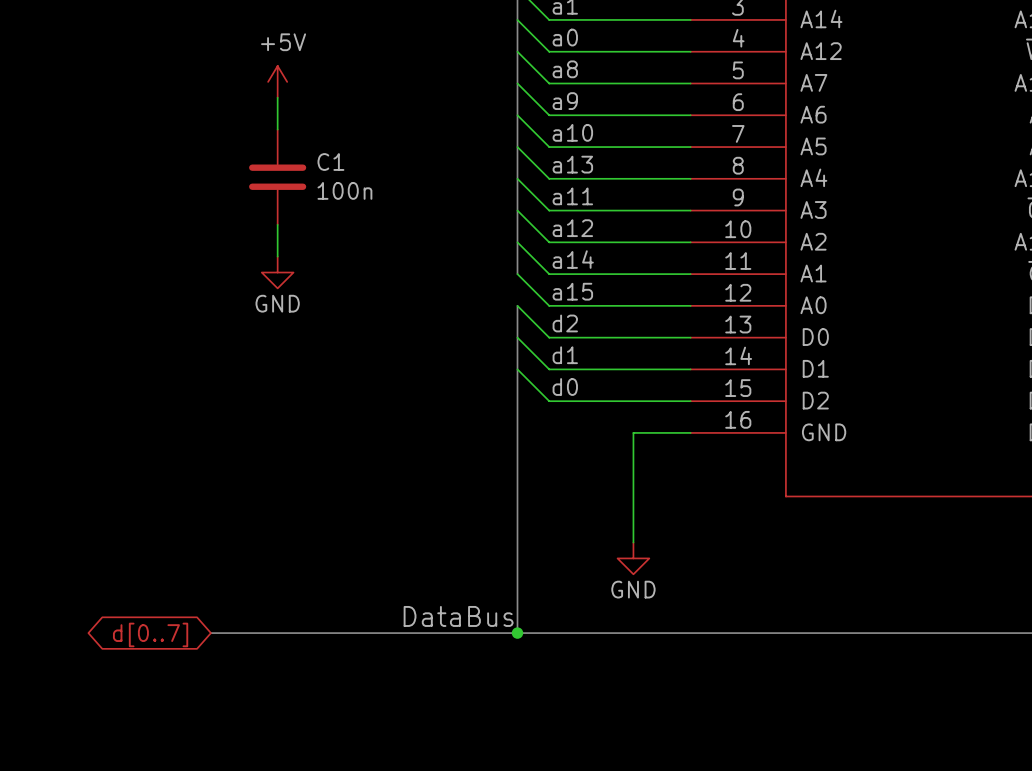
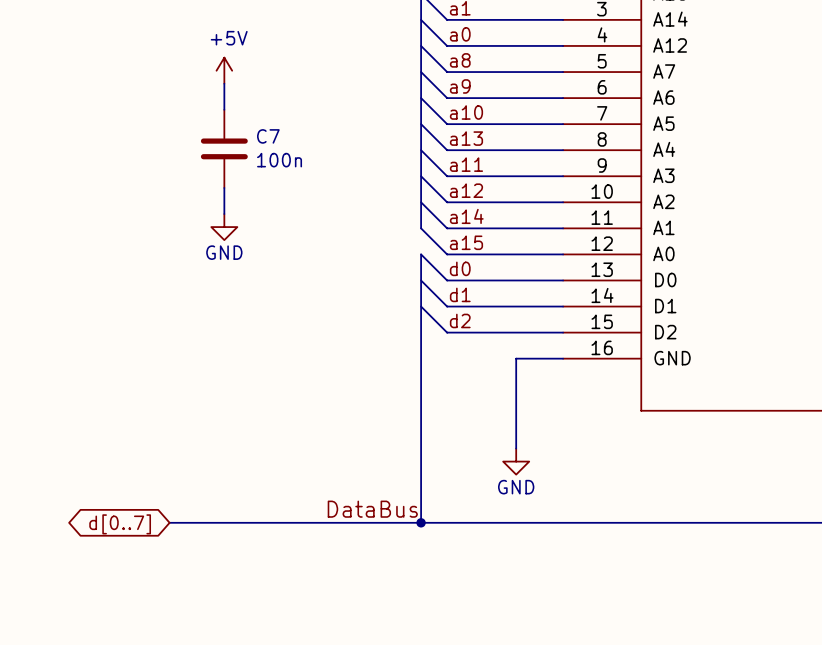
C1 name: C1 (330, 162) -> C7 (268, 136)
label: d2 (565, 323) -> d0 (460, 268)
label: d0 (565, 387) -> d2 (460, 320)

